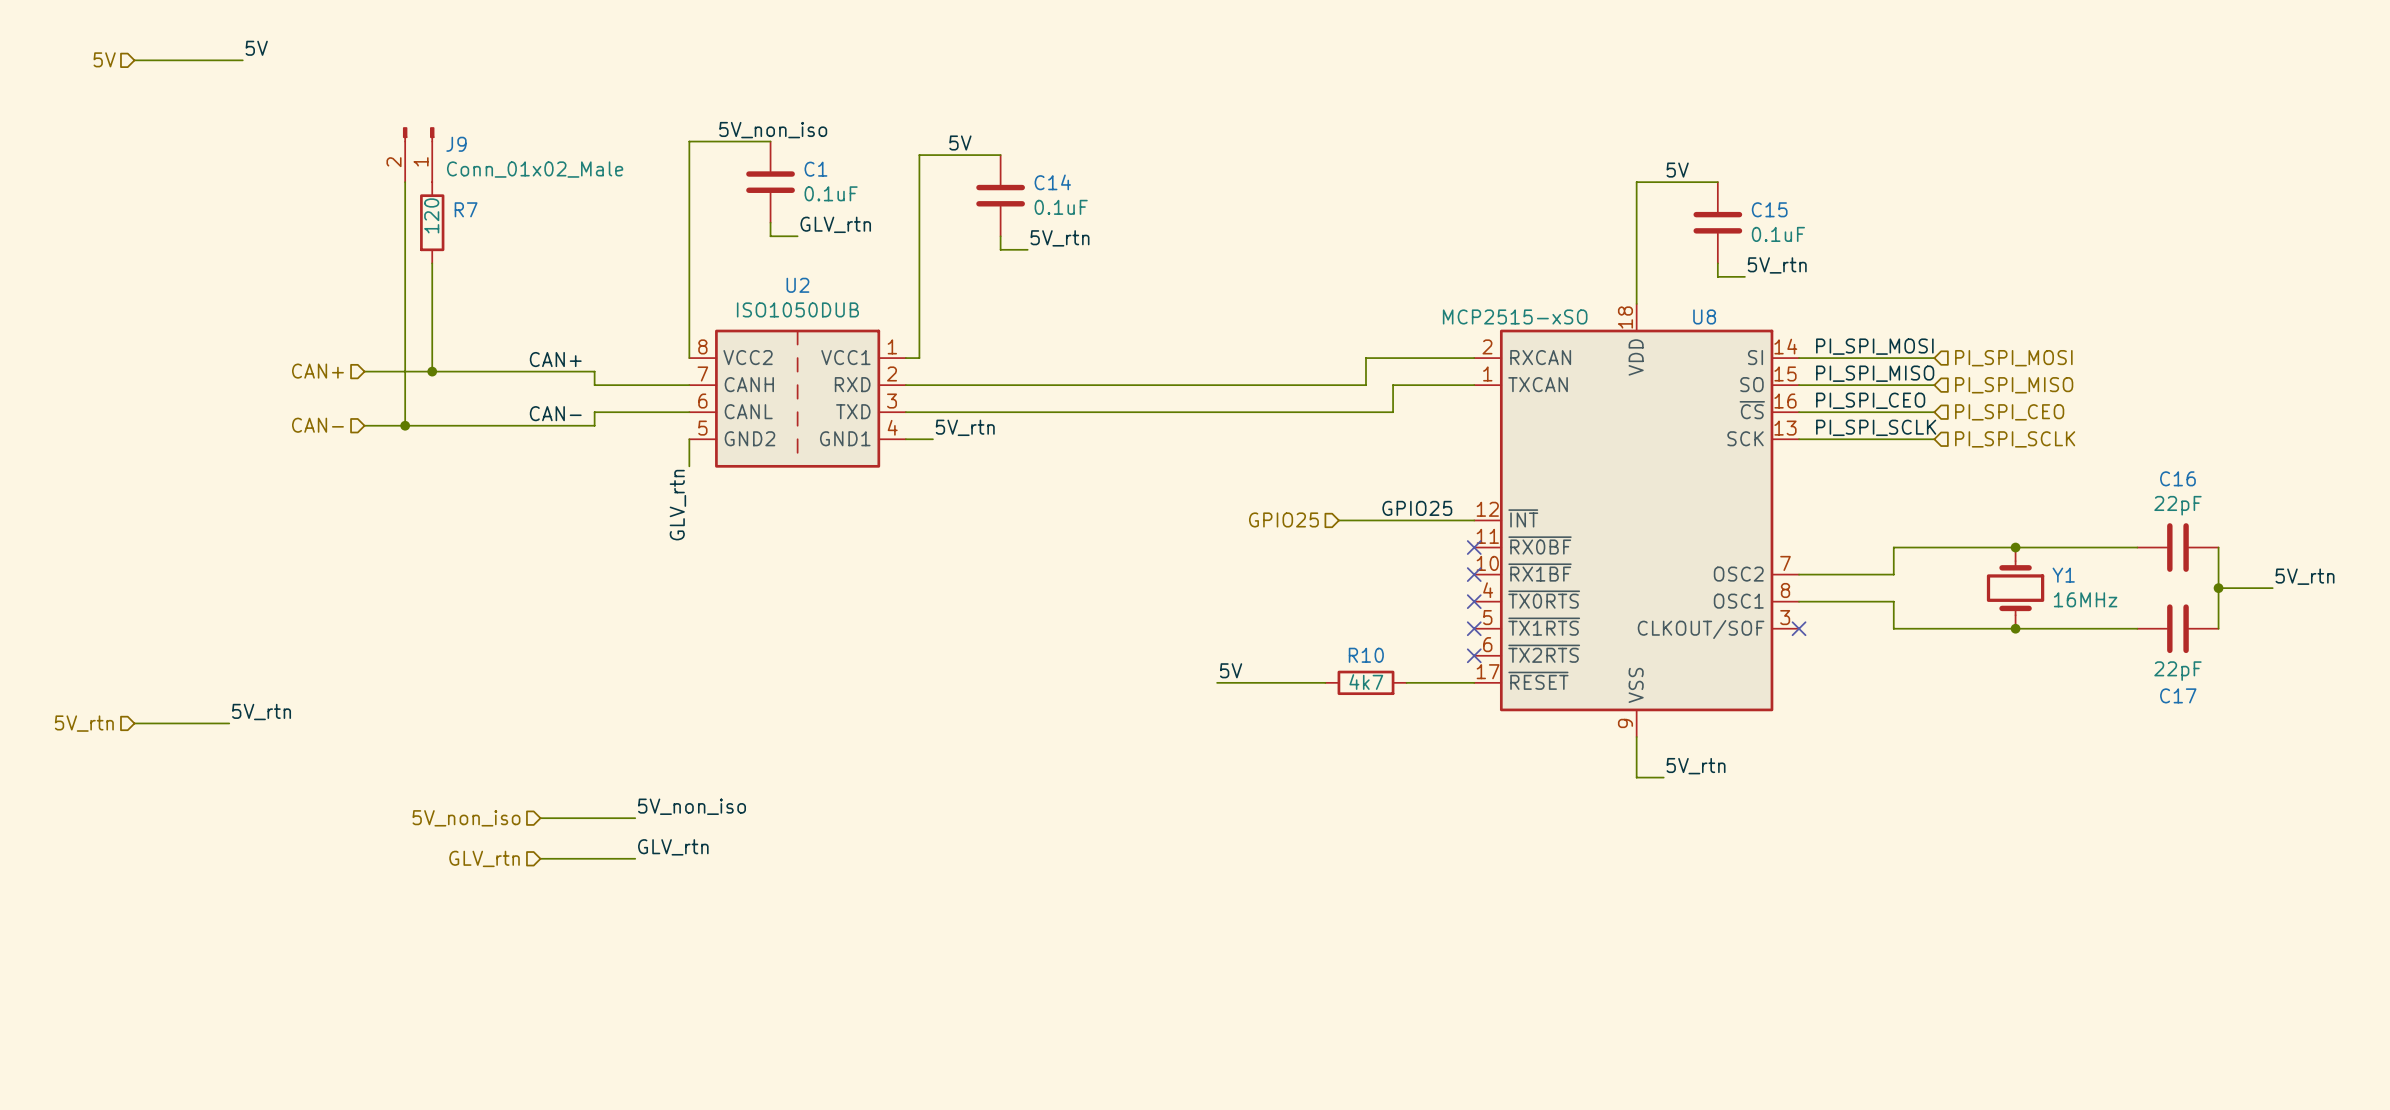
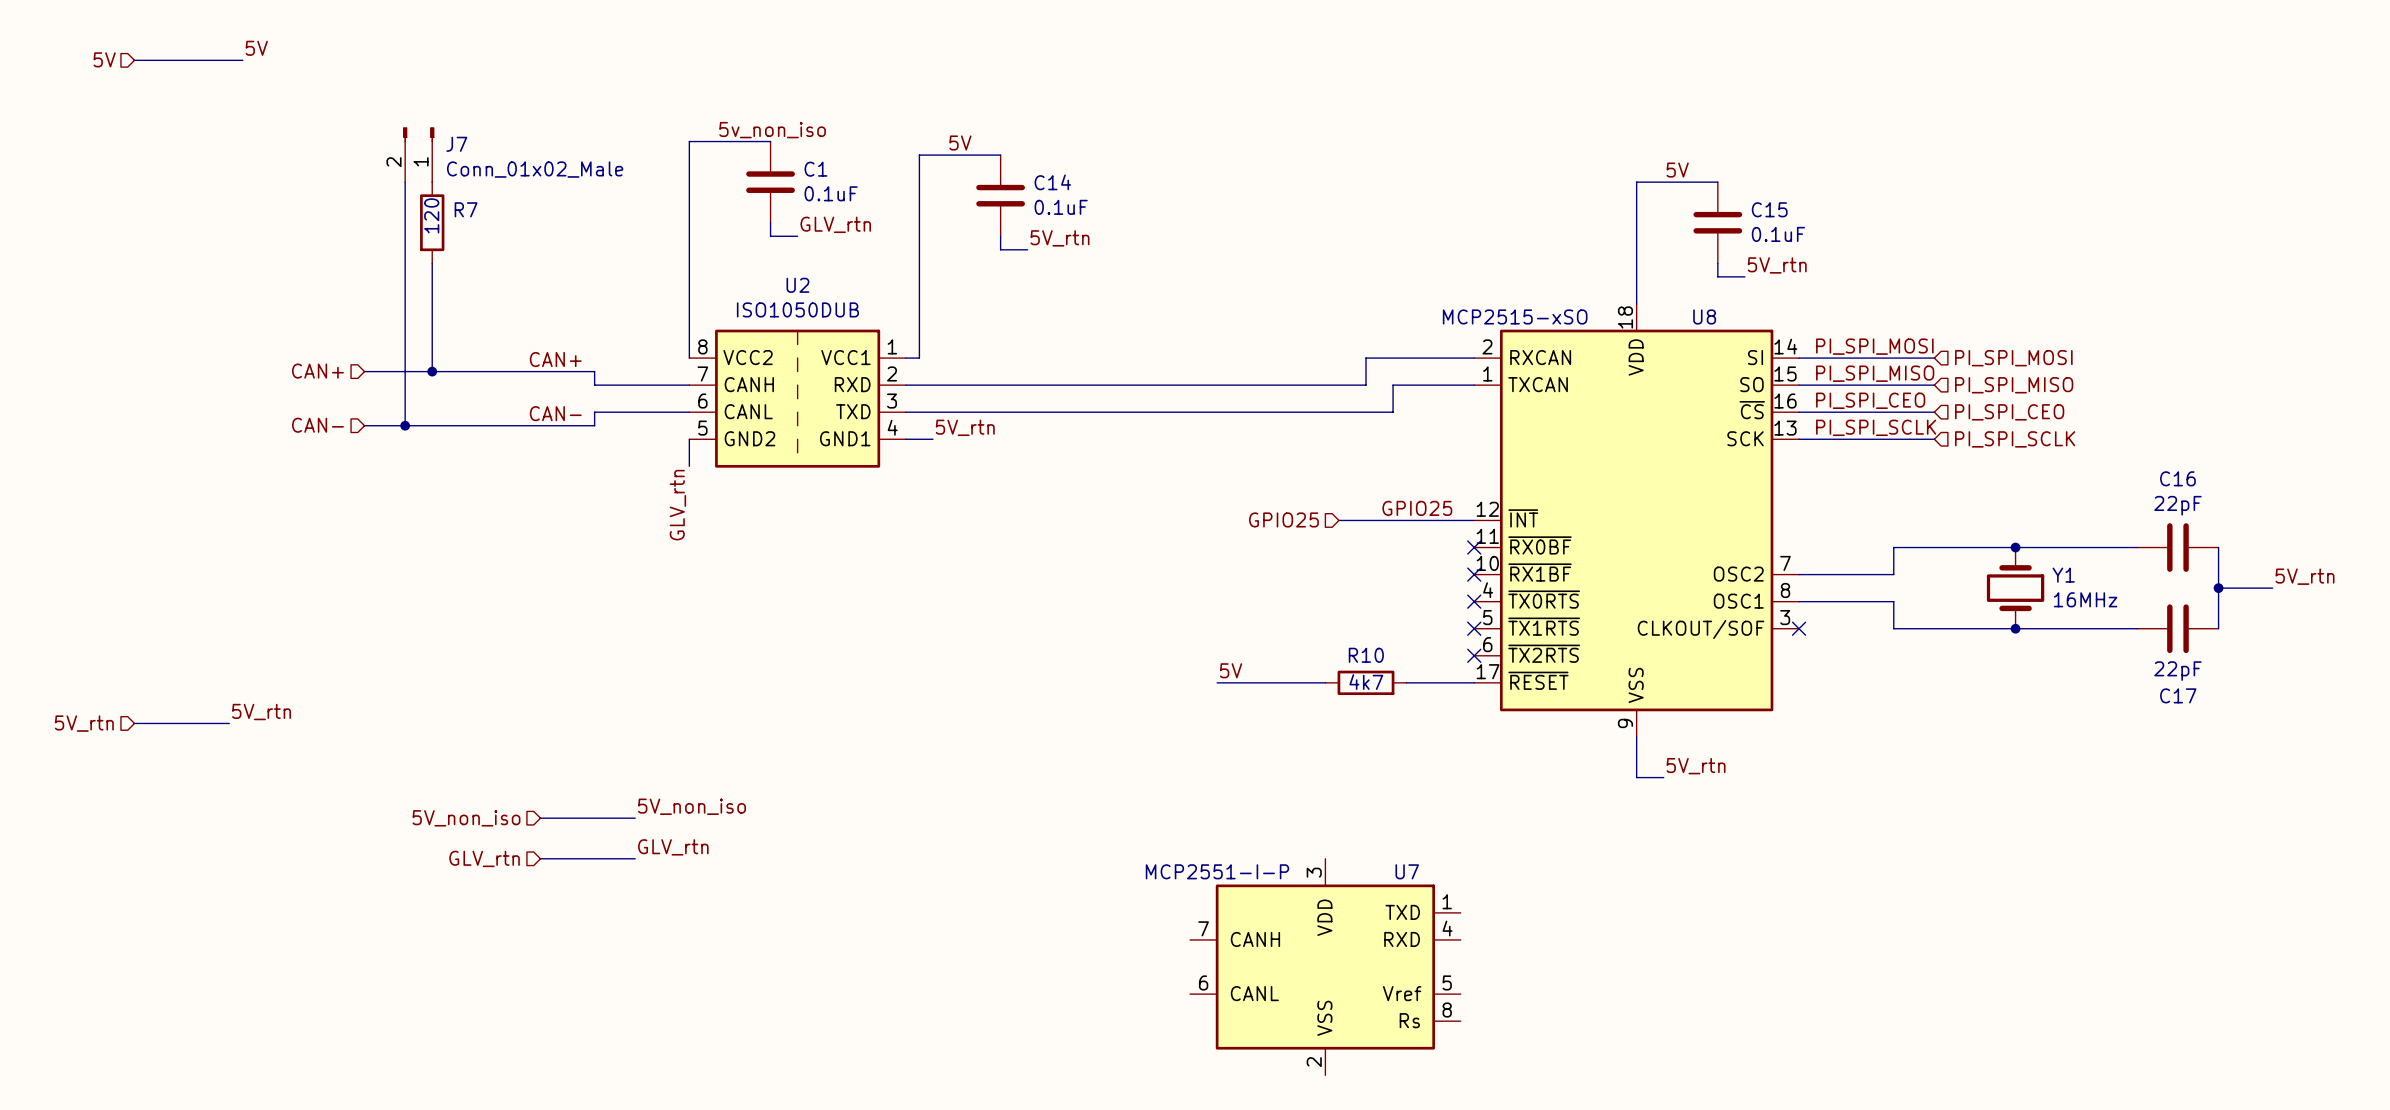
label: 5V_non_iso (773, 130) -> 5v_non_iso (772, 130)
J9 name: J9 (456, 144) -> J7 (456, 144)
U7: none -> MCP2551-I-P (1325, 967)

